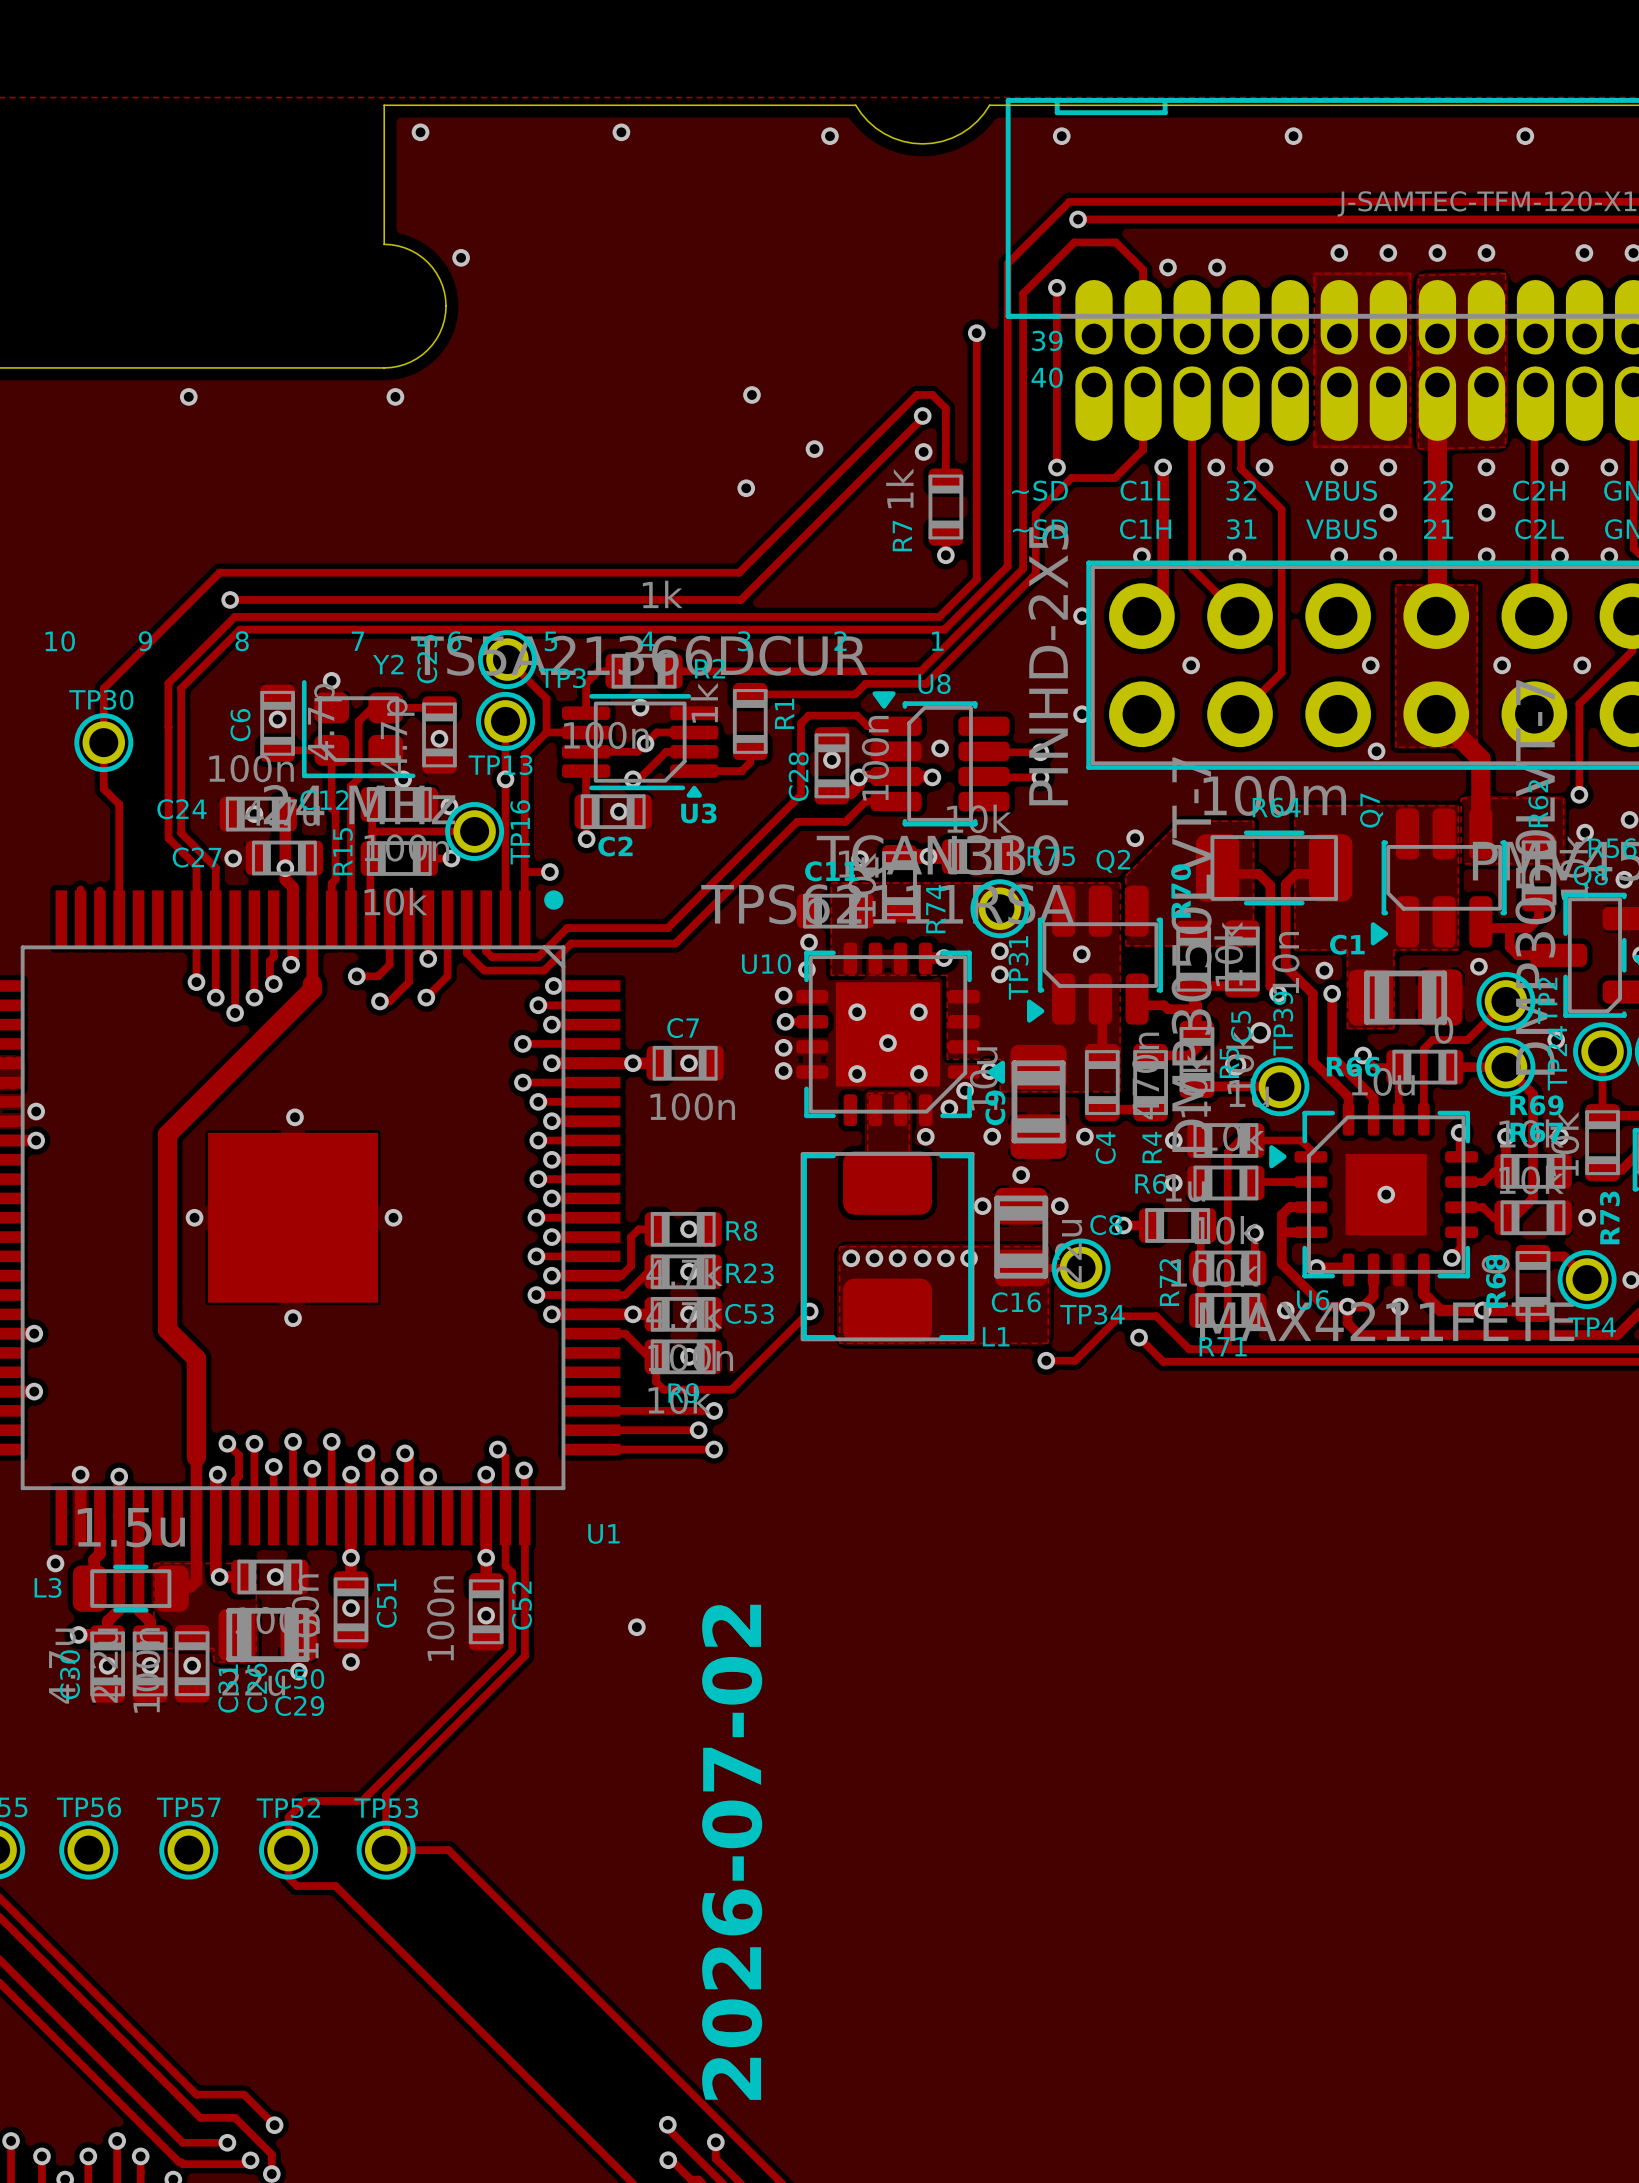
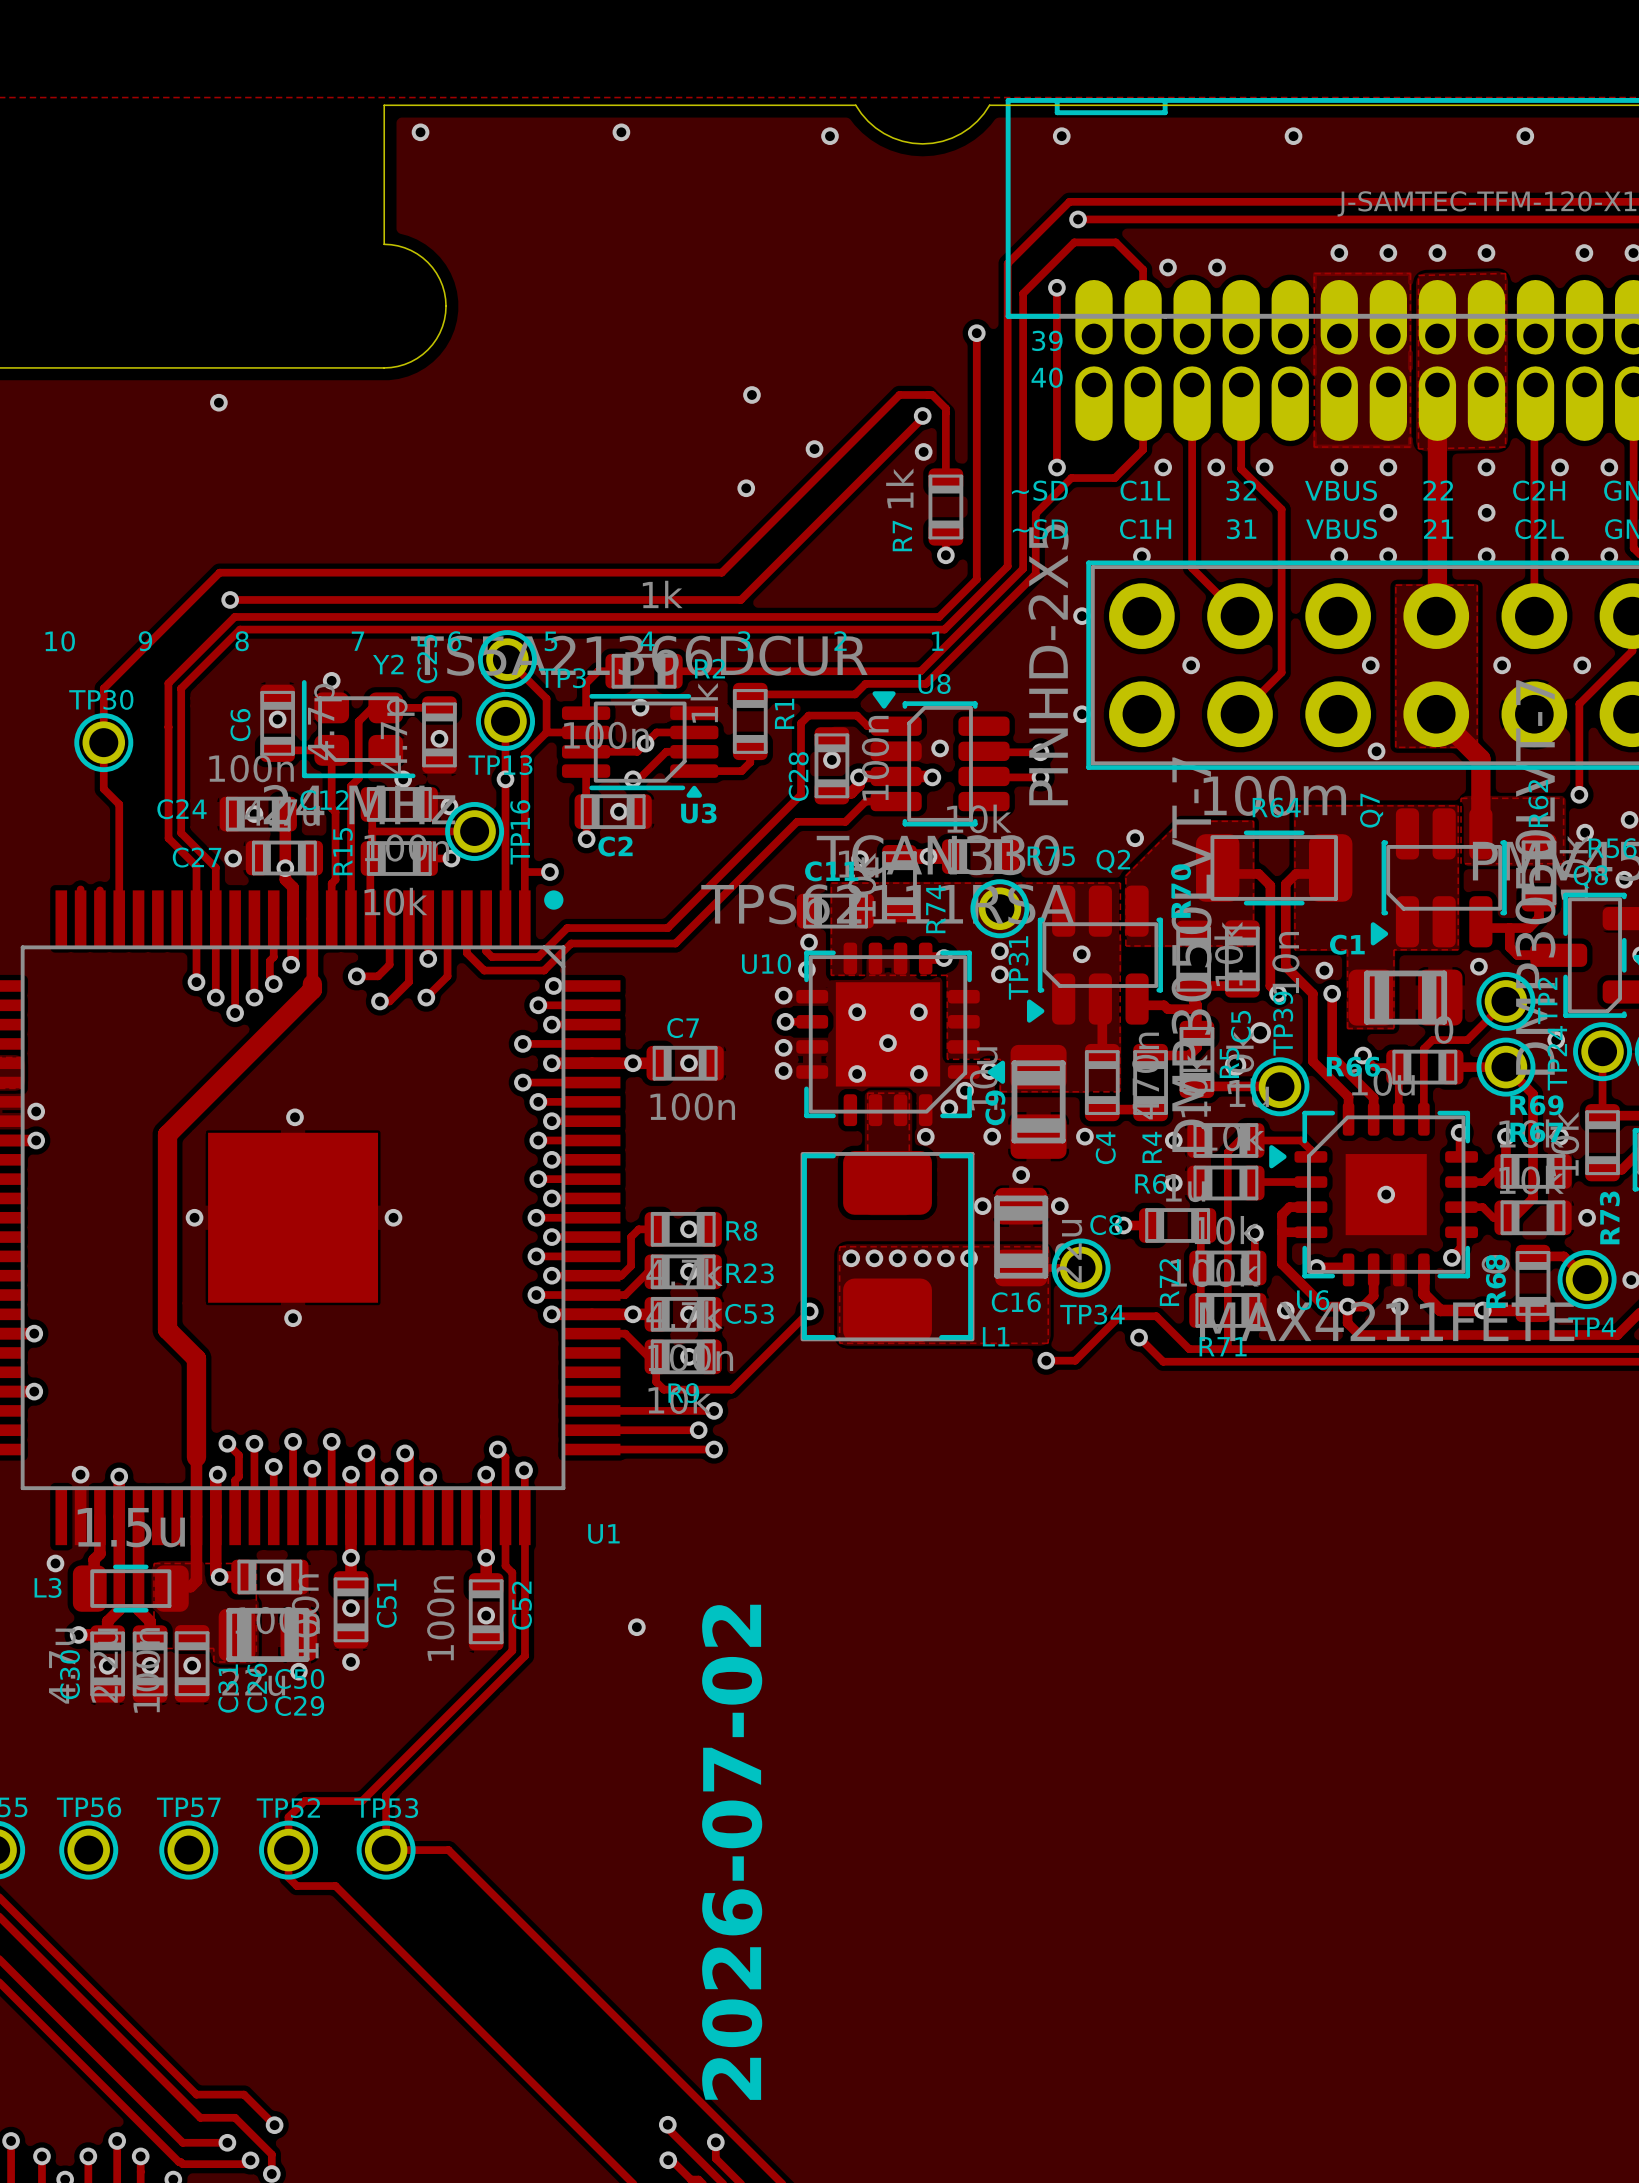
via: (461, 257) -> none
track: (916, 394) (739, 572) (721, 572) -> (916, 394) (899, 394) (721, 572)
via position: (188, 396) -> (218, 402)
via: (395, 396) -> none
track: (1163, 467) (1163, 594) (1141, 616) -> none
via: (1237, 557) -> none

